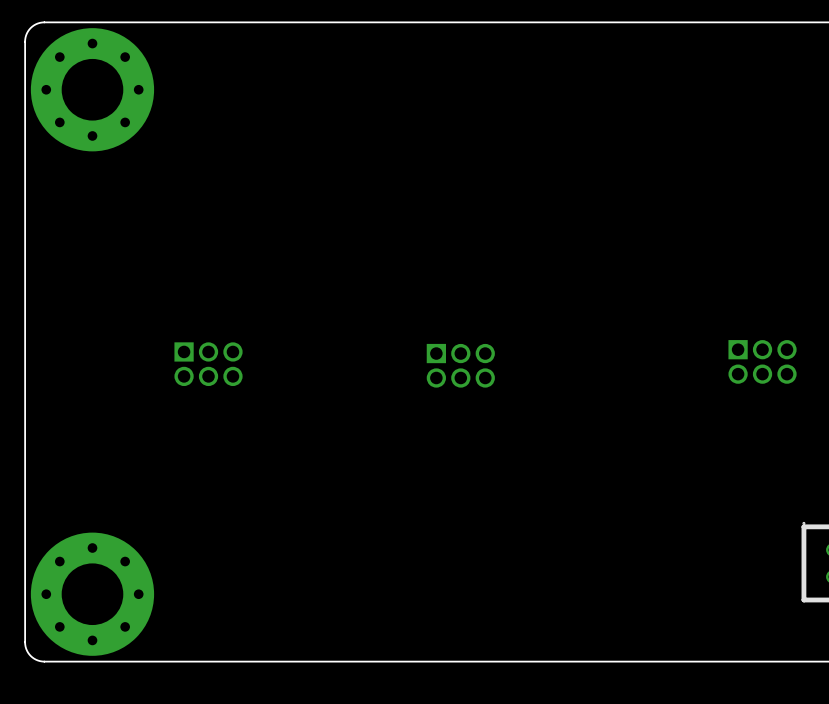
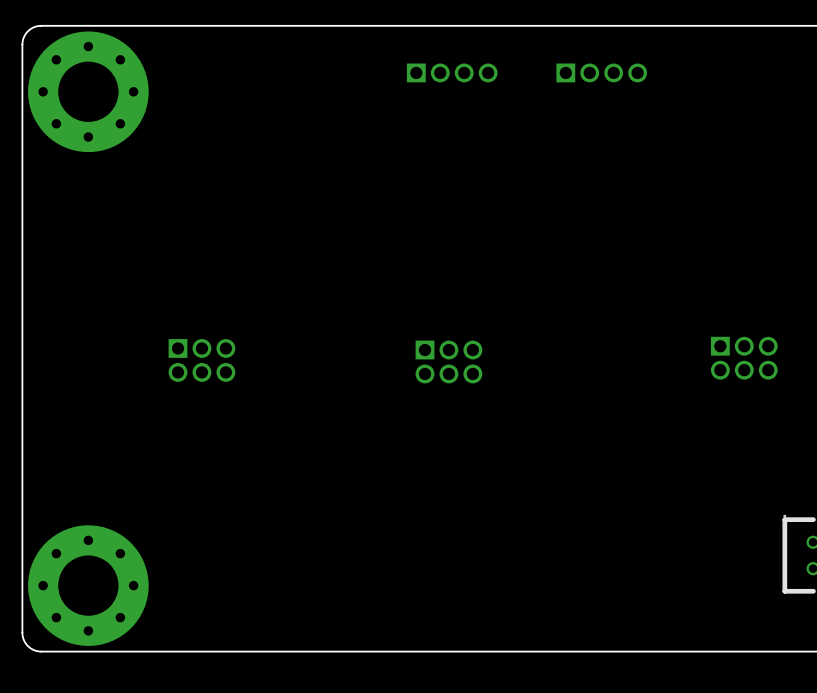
part: none -> (452, 72)
part: none -> (601, 72)

